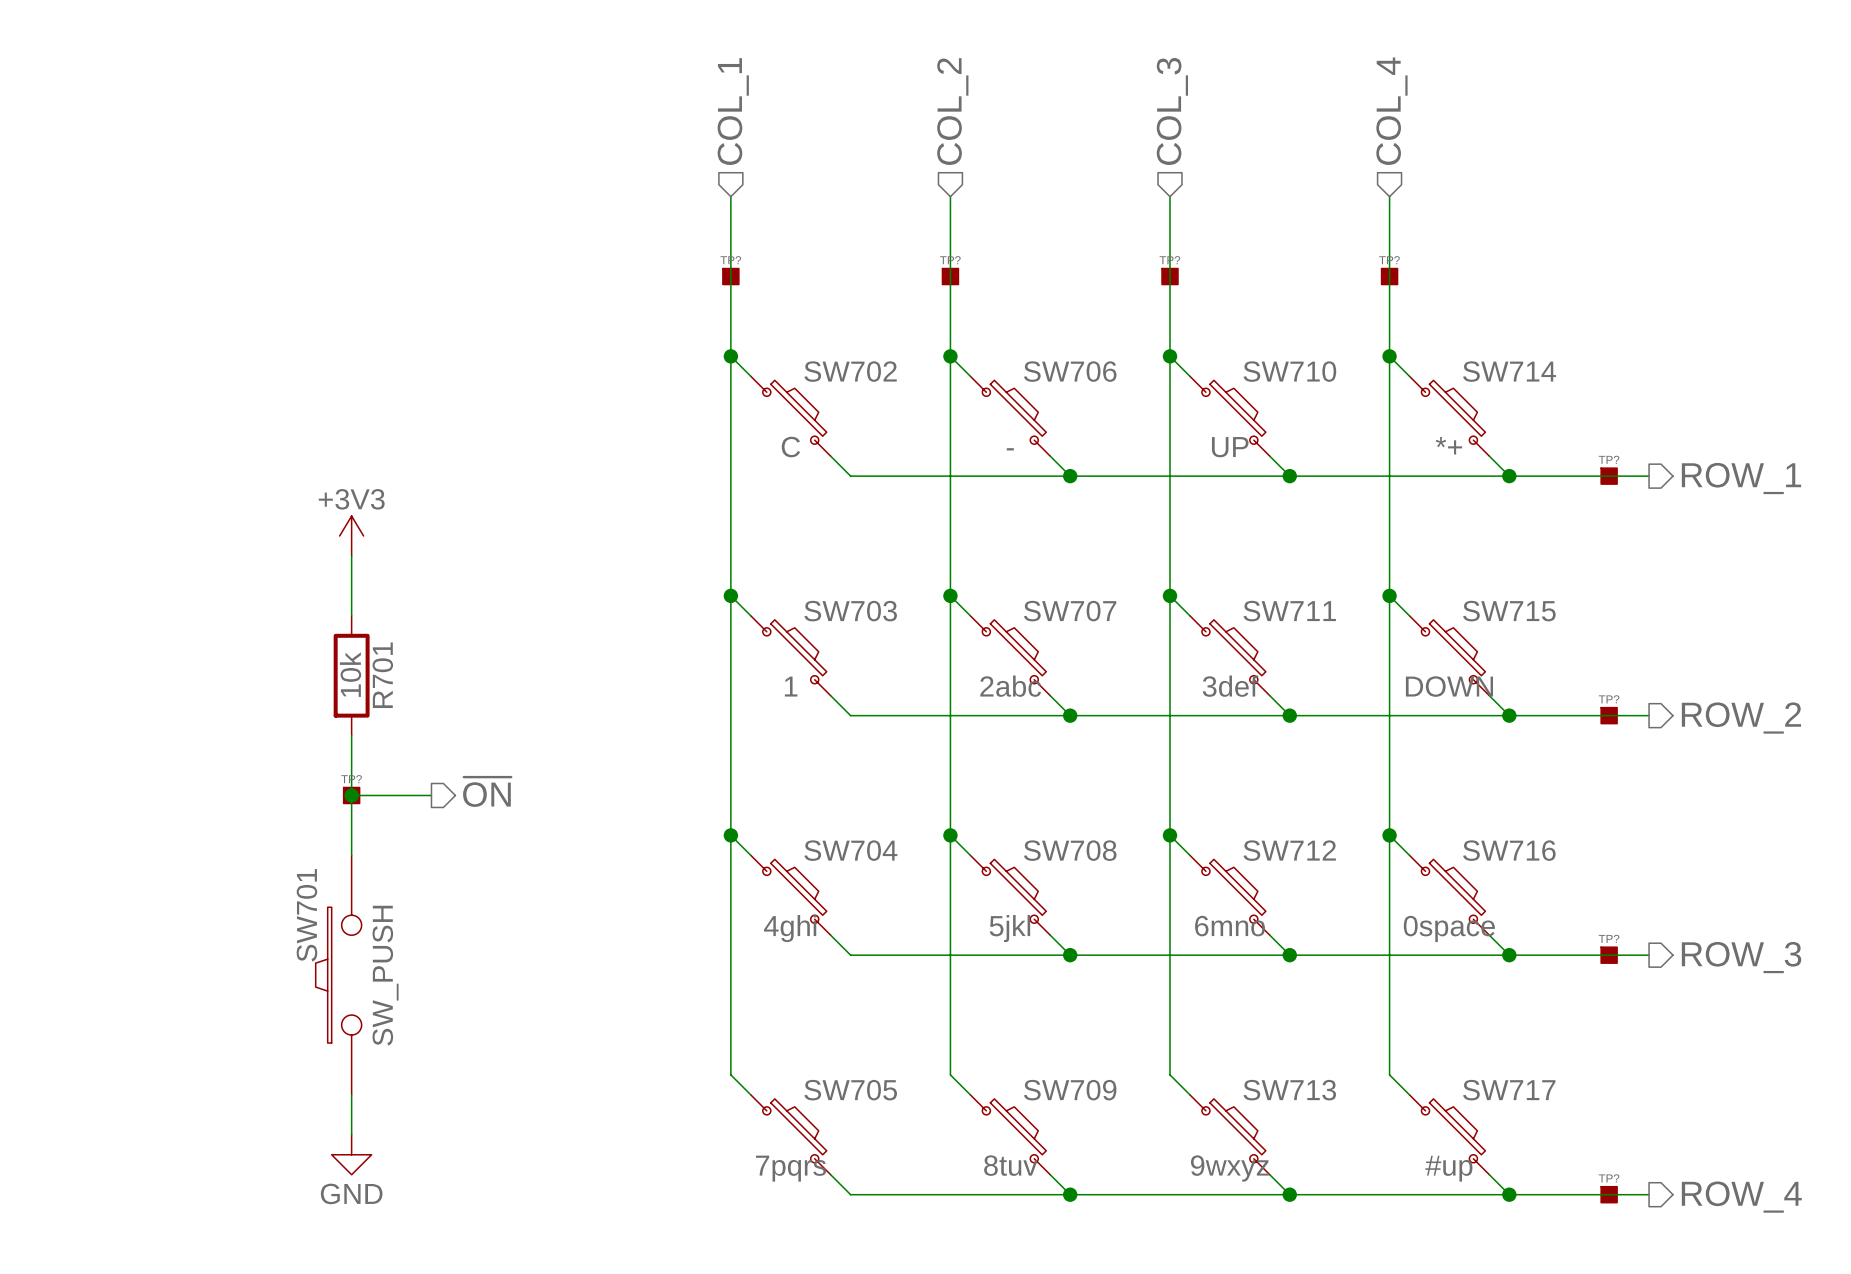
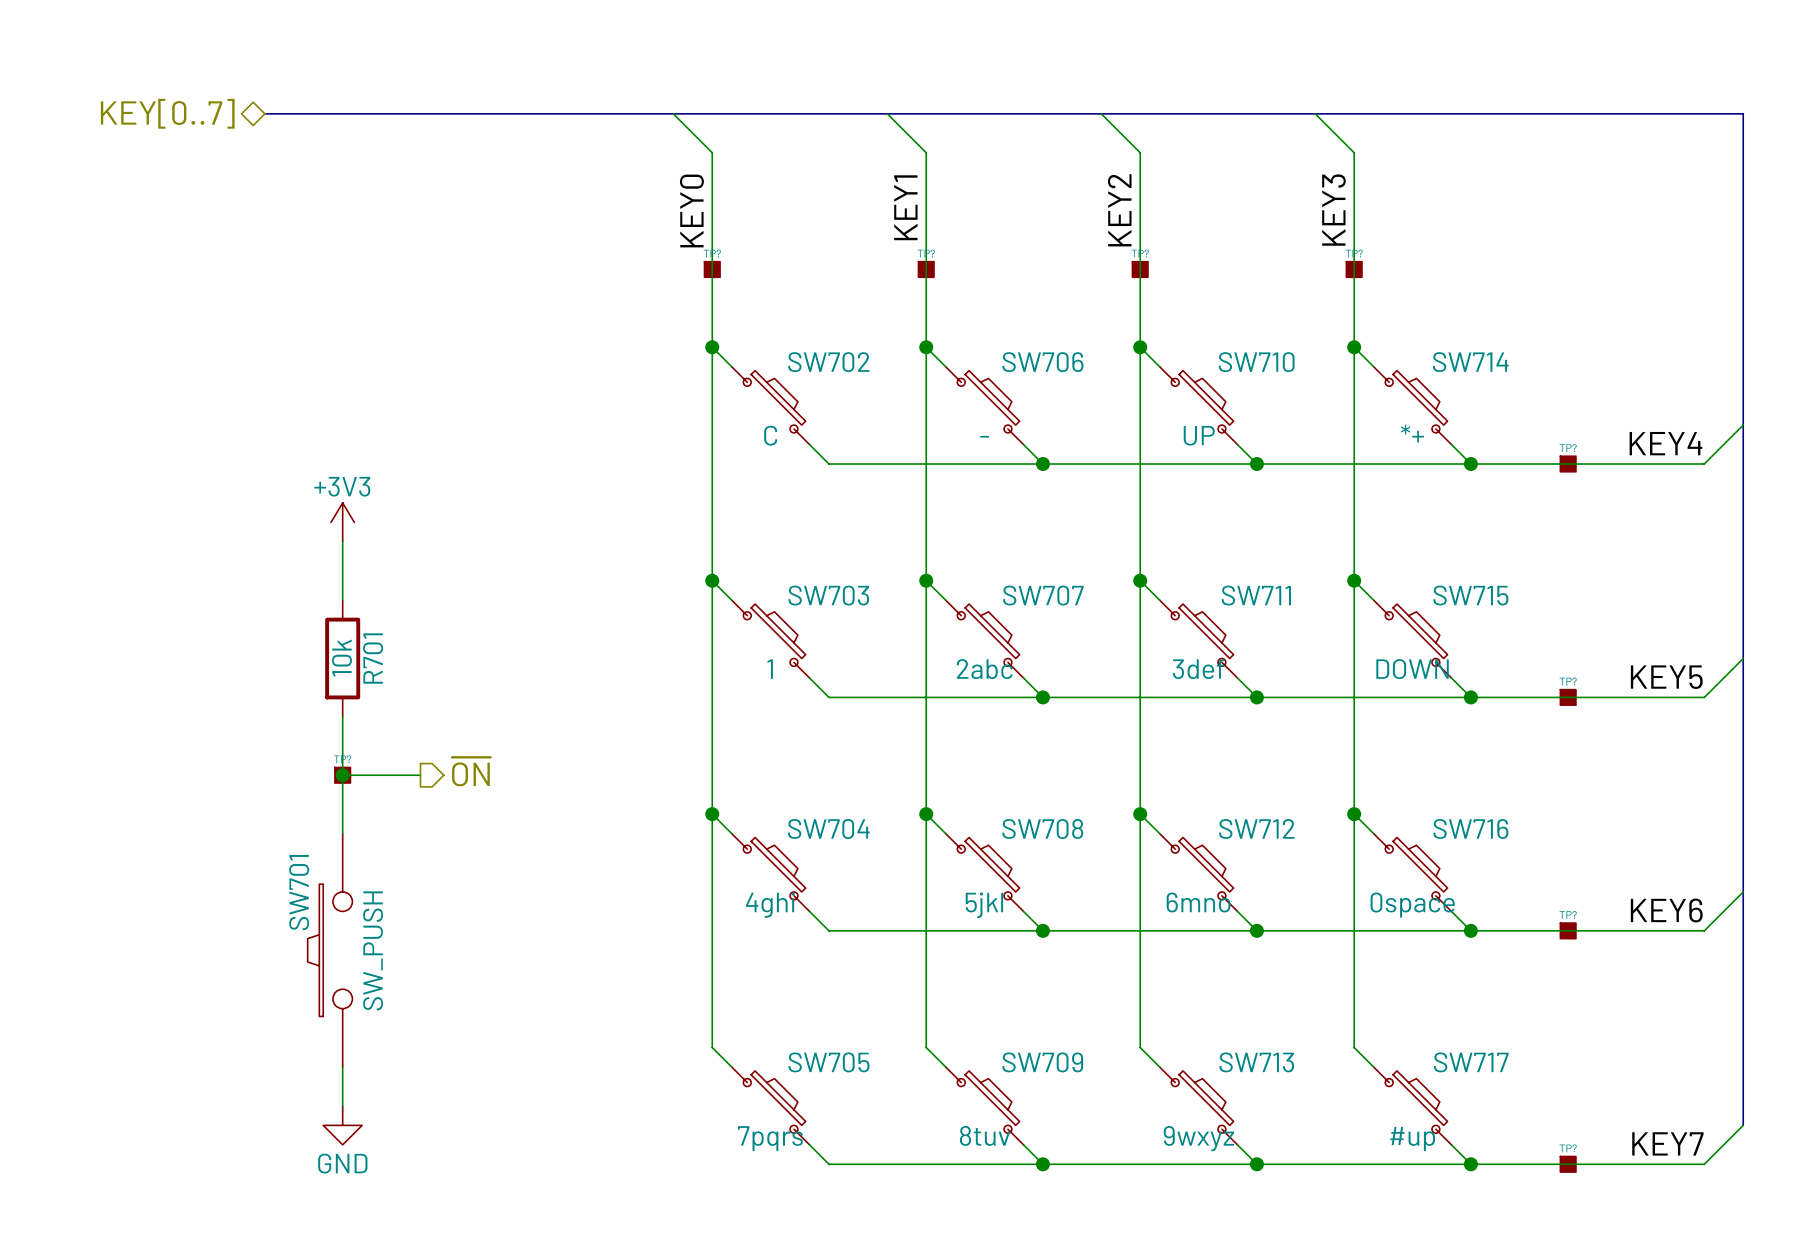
hierarchical label: COL_1 (733, 111) -> none
hierarchical label: COL_2 (952, 111) -> none
hierarchical label: COL_3 (1172, 111) -> none
hierarchical label: COL_4 (1391, 111) -> none
bus: none -> (264, 113) (1743, 113) (1743, 1125)
wire: none -> (673, 113) (712, 152) (712, 191)
wire: none -> (887, 113) (926, 152) (926, 191)
wire: none -> (1101, 113) (1140, 152) (1140, 191)
wire: none -> (1315, 113) (1354, 152) (1354, 191)
hierarchical label: none -> KEY[0..7] (167, 113)
label: none -> KEY0 (691, 210)
label: none -> KEY1 (905, 207)
label: none -> KEY2 (1119, 210)
label: none -> KEY3 (1333, 210)
wire: none -> (1743, 425) (1704, 464) (1607, 464)
label: none -> KEY4 (1665, 443)
hierarchical label: ROW_1 (1741, 478) -> none
wire: none -> (1743, 658) (1704, 697) (1607, 697)
label: none -> KEY5 (1666, 677)
hierarchical label: ROW_2 (1741, 718) -> none
wire: none -> (1743, 891) (1704, 930) (1607, 930)
label: none -> KEY6 (1666, 910)
hierarchical label: ROW_3 (1741, 957) -> none
wire: none -> (1743, 1125) (1704, 1164) (1607, 1164)
label: none -> KEY7 (1667, 1143)
hierarchical label: ROW_4 (1741, 1197) -> none

